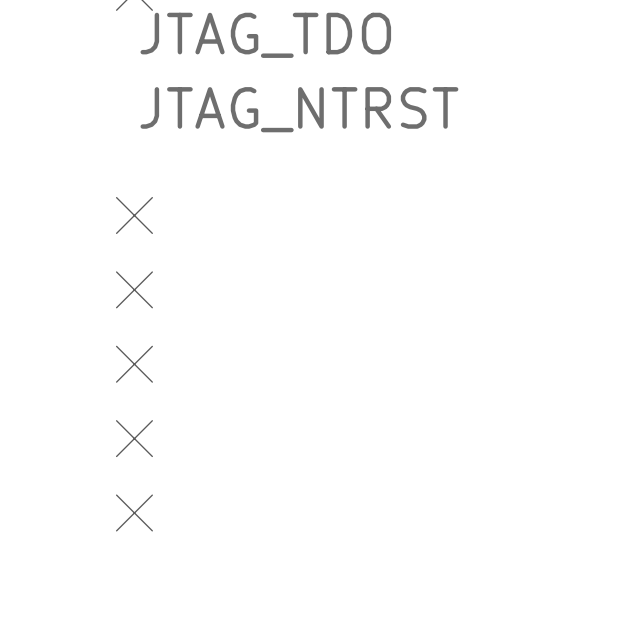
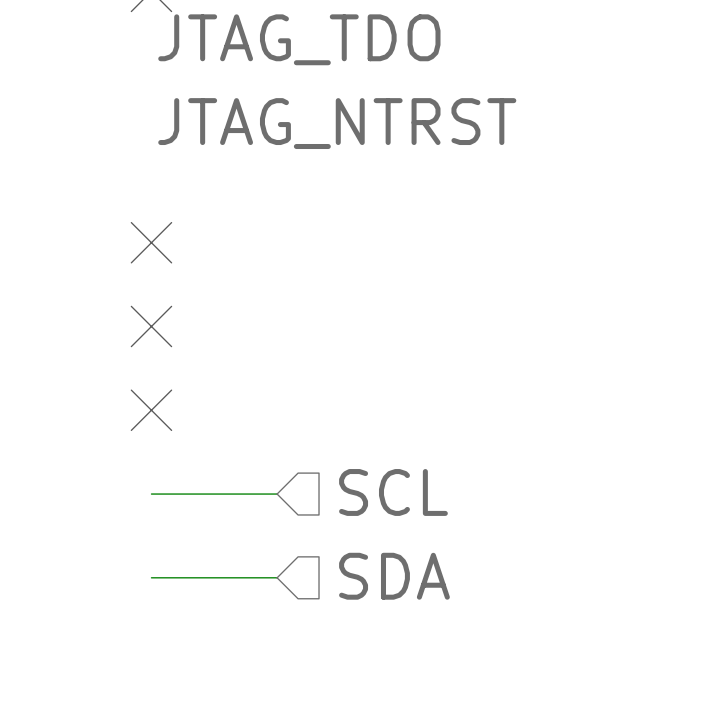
hierarchical label: none -> SCL (393, 492)
wire: none -> (151, 494) (277, 494)
no-connect mark: (134, 438) -> none
hierarchical label: none -> SDA (394, 576)
wire: none -> (151, 577) (277, 577)
no-connect mark: (134, 512) -> none

